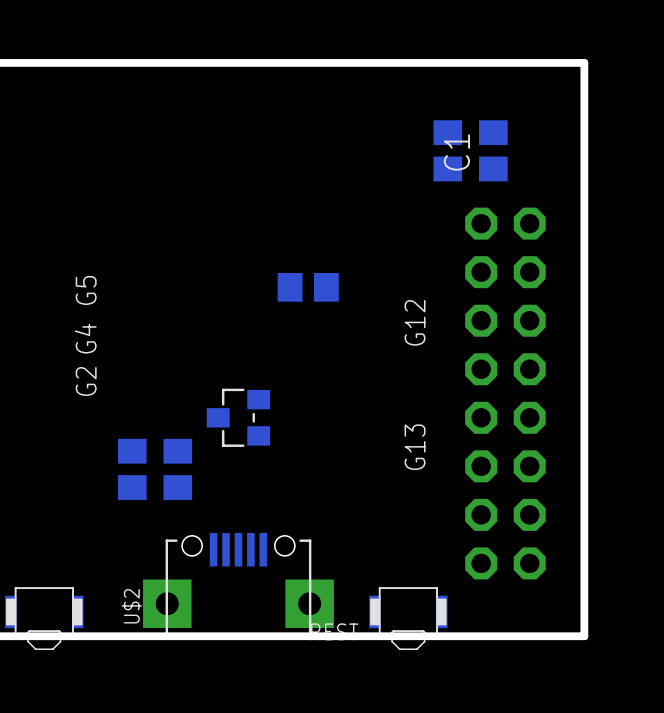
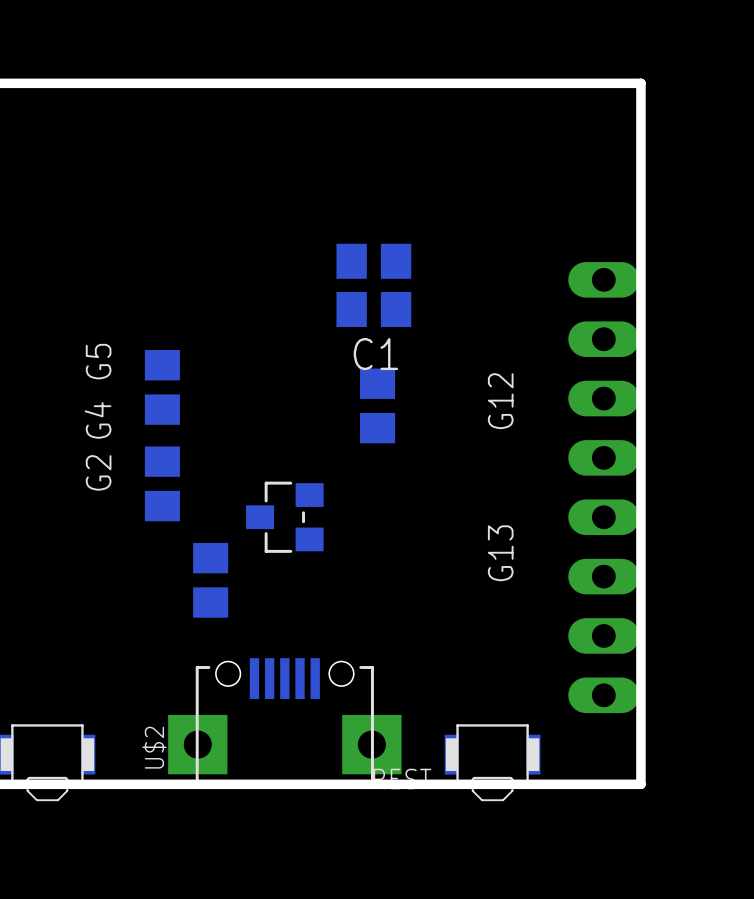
board edge: (529, 62) (584, 62) (584, 636) (529, 636) -> (640, 83) (640, 784)
part: (447, 150) -> none
C1 rotation: 0° (493, 150) -> 90° clockwise (373, 309)
C1 position: (493, 150) -> (373, 309)
C1 name position: C1 (456, 152) -> C1 (375, 354)
part: none -> (373, 261)
part: (308, 287) -> none
part: (505, 296) -> none
part: none -> (162, 387)
part: none -> (377, 405)
part: none -> (162, 483)
part: none -> (603, 487)
part: (132, 469) -> none
part: (505, 490) -> none

